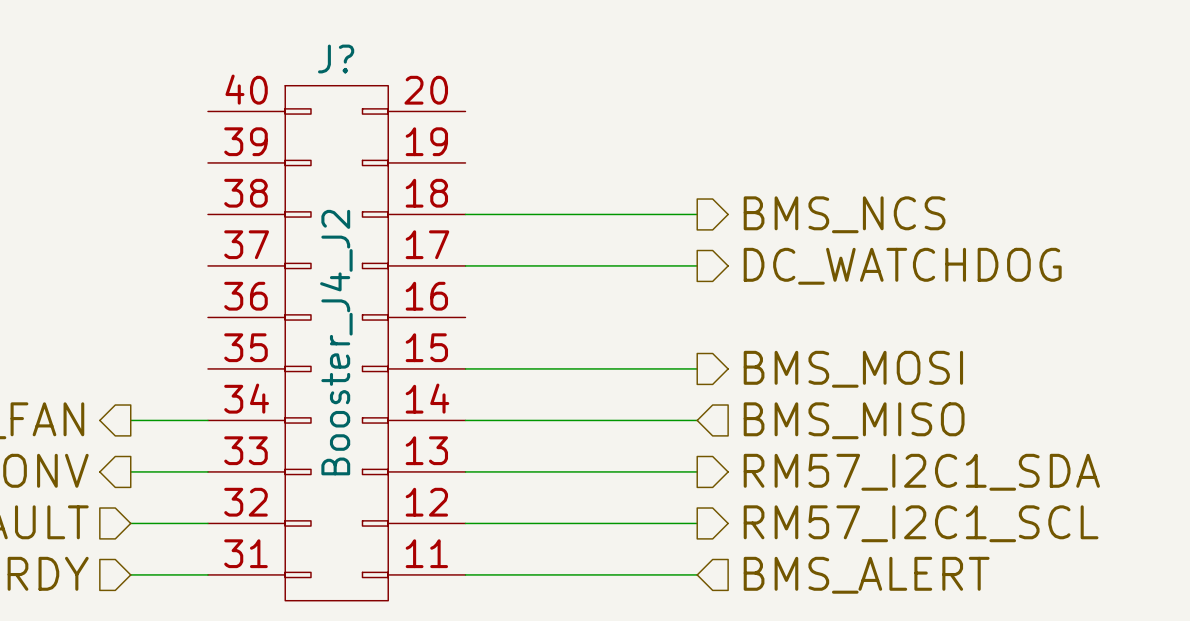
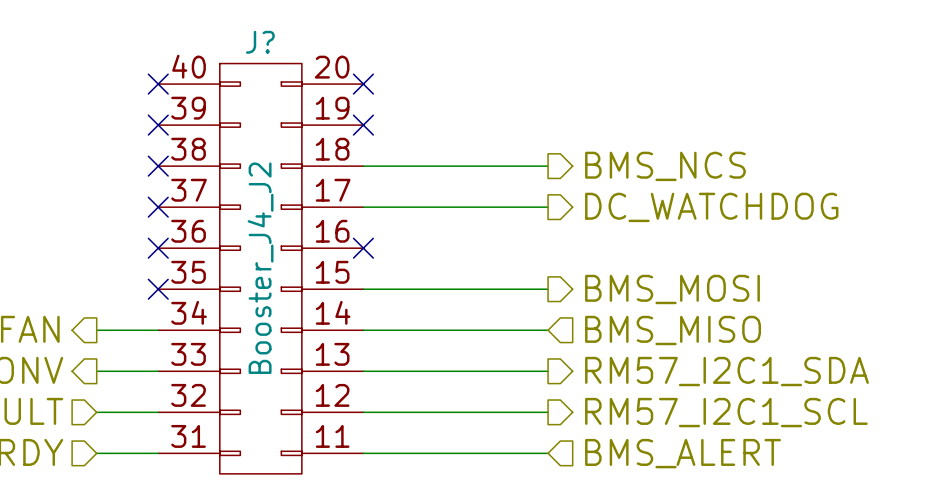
no-connect mark: none -> (158, 84)
no-connect mark: none -> (363, 84)
no-connect mark: none -> (158, 125)
no-connect mark: none -> (363, 125)
no-connect mark: none -> (158, 166)
no-connect mark: none -> (158, 207)
no-connect mark: none -> (158, 248)
no-connect mark: none -> (363, 248)
no-connect mark: none -> (158, 289)

